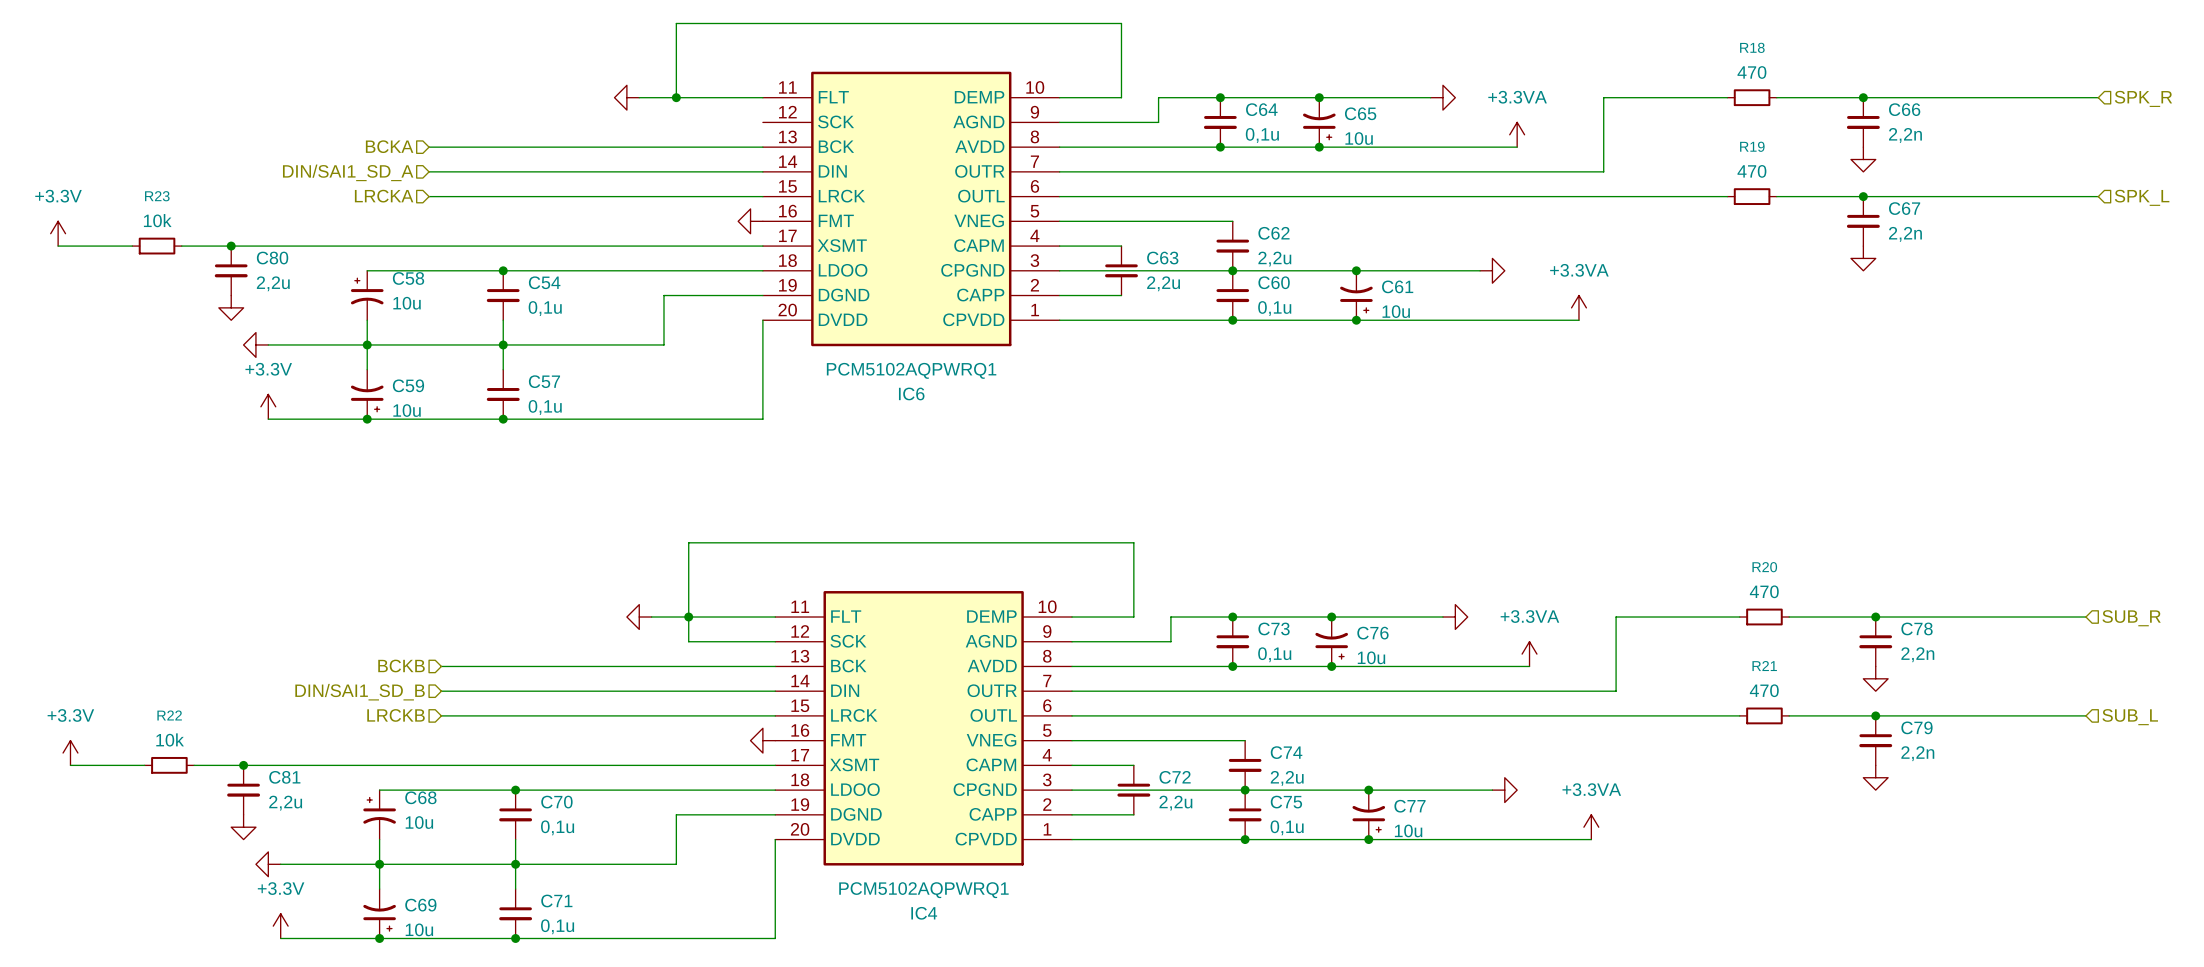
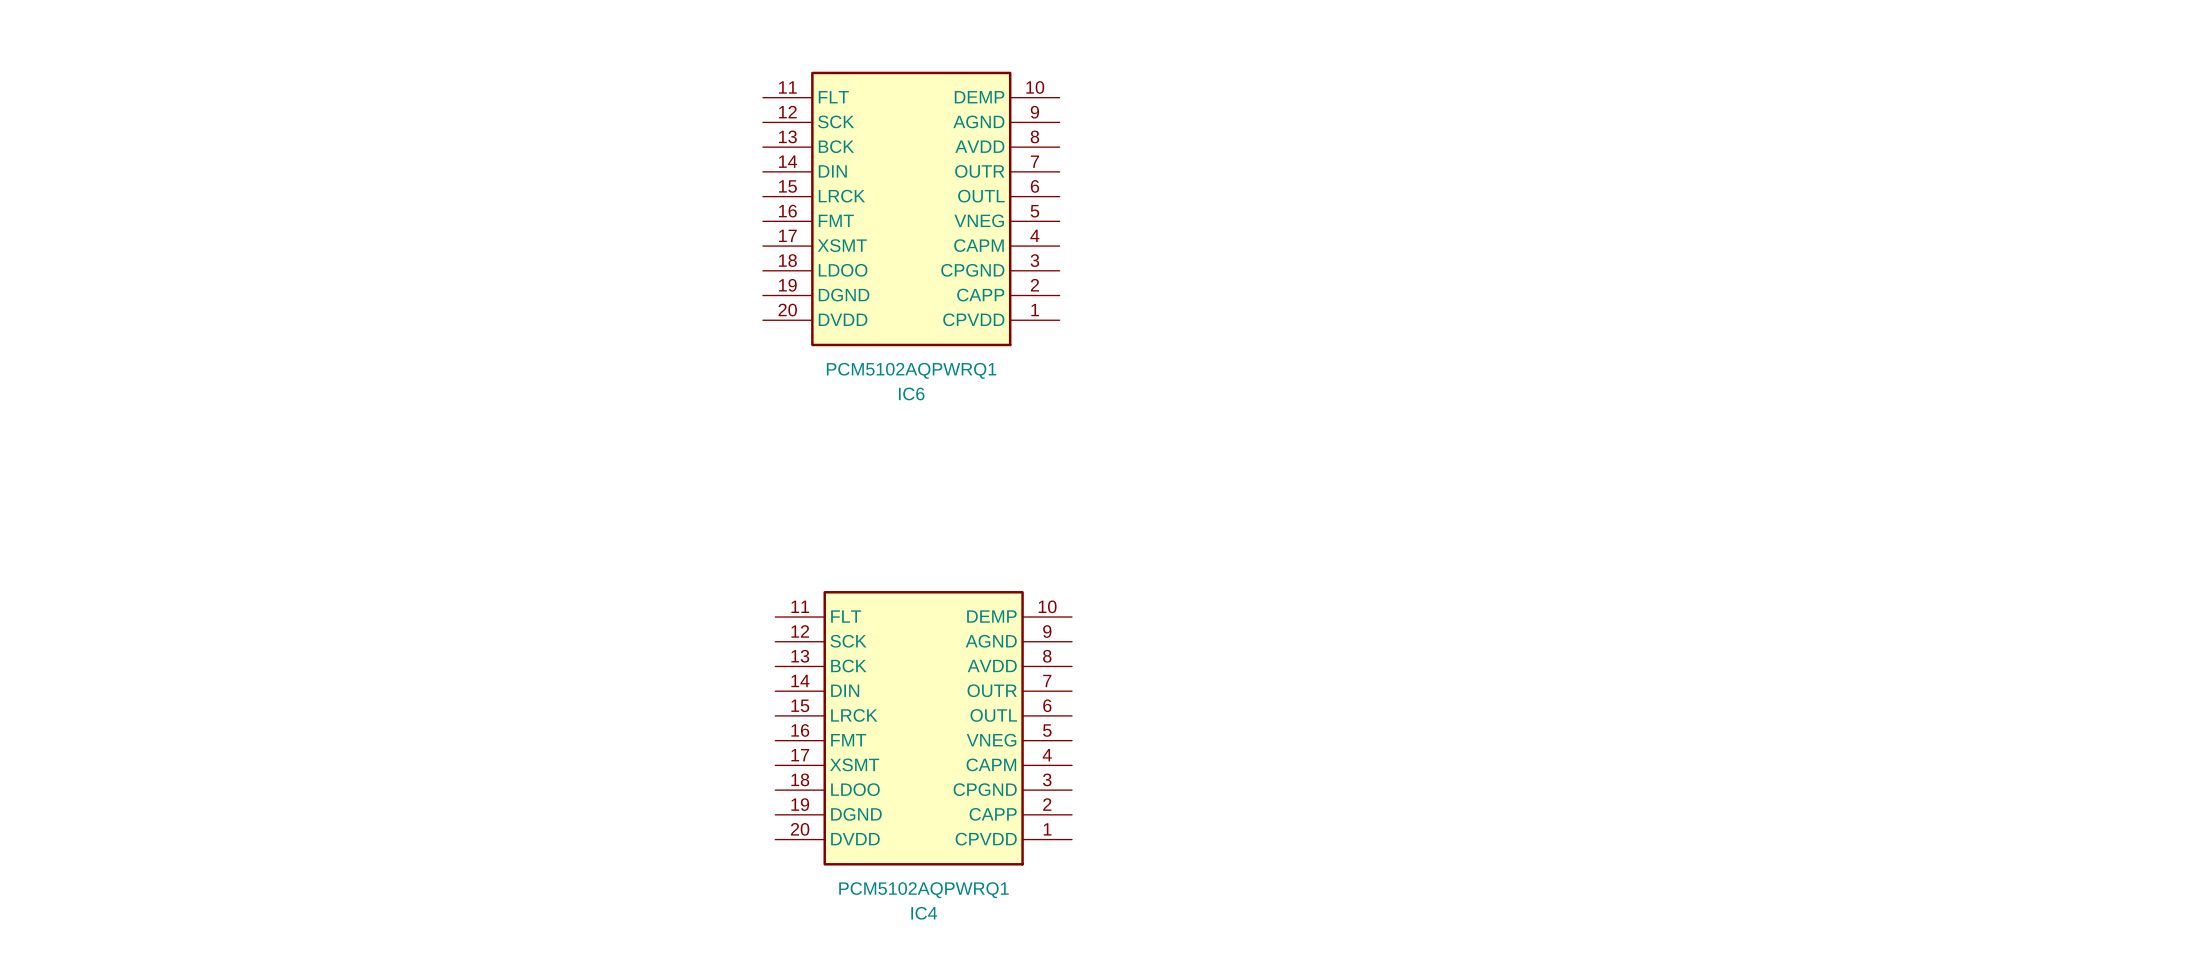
power symbol: (626, 97) -> none
wire: (639, 97) (762, 97) -> none
wire: (676, 97) (676, 23) (1121, 23) (1121, 97) (1059, 97) -> none
junction: (676, 97) -> none
junction: (1220, 97) -> none
junction: (1319, 97) -> none
wire: (1430, 97) (1158, 97) (1158, 122) (1059, 122) -> none
power symbol: (1442, 97) -> none
wire: (1727, 97) (1603, 97) (1603, 171) (1059, 171) -> none
R18: 470 (1752, 97) -> none
wire: (1776, 97) (2098, 97) -> none
junction: (1863, 97) -> none
hierarchical label: SPK_R (2143, 98) -> none
C64: 0,1u (1220, 122) -> none
C65: 10u (1319, 122) -> none
C66: 2,2n (1863, 122) -> none
power symbol: +3.3VA (1517, 134) -> none
hierarchical label: BCKA (389, 146) -> none
wire: (429, 147) (762, 147) -> none
wire: (1059, 147) (1517, 147) -> none
junction: (1220, 147) -> none
junction: (1319, 147) -> none
power symbol: (1863, 159) -> none
wire: (429, 171) (762, 171) -> none
hierarchical label: DIN/SAI1_SD_A (348, 172) -> none
hierarchical label: LRCKA (384, 196) -> none
wire: (429, 196) (762, 196) -> none
wire: (1059, 196) (1727, 196) -> none
R19: 470 (1752, 196) -> none
wire: (1776, 196) (2098, 196) -> none
junction: (1863, 196) -> none
hierarchical label: SPK_L (2142, 197) -> none
power symbol: (750, 221) -> none
wire: (1059, 221) (1232, 221) -> none
C67: 2,2n (1863, 221) -> none
power symbol: +3.3V (58, 233) -> none
wire: (58, 246) (132, 246) -> none
R23: 10k (157, 246) -> none
wire: (181, 246) (762, 246) -> none
junction: (231, 246) -> none
wire: (1059, 246) (1121, 246) -> none
C62: 2,2u (1232, 246) -> none
power symbol: (1863, 258) -> none
C80: 2,2u (231, 270) -> none
wire: (367, 270) (762, 270) -> none
junction: (503, 270) -> none
wire: (1059, 270) (1480, 270) -> none
C63: 2,2u (1121, 270) -> none
junction: (1232, 270) -> none
junction: (1356, 270) -> none
power symbol: (1492, 270) -> none
C58: 10u (367, 295) -> none
C54: 0,1u (503, 295) -> none
wire: (762, 295) (663, 295) (663, 344) (268, 344) -> none
wire: (1059, 295) (1121, 295) -> none
C60: 0,1u (1232, 295) -> none
C61: 10u (1356, 295) -> none
power symbol: (231, 307) -> none
power symbol: +3.3VA (1578, 307) -> none
wire: (367, 320) (367, 369) -> none
wire: (503, 320) (503, 369) -> none
wire: (762, 320) (762, 419) (268, 419) -> none
wire: (1059, 320) (1578, 320) -> none
junction: (1232, 320) -> none
junction: (1356, 320) -> none
power symbol: (255, 344) -> none
junction: (367, 344) -> none
junction: (503, 344) -> none
C59: 10u (367, 394) -> none
C57: 0,1u (503, 394) -> none
power symbol: +3.3V (268, 406) -> none
junction: (367, 419) -> none
junction: (503, 419) -> none
power symbol: (639, 617) -> none
wire: (651, 617) (775, 617) -> none
junction: (688, 617) -> none
wire: (1072, 617) (1133, 617) (1133, 542) (688, 542) (688, 641) (775, 641) -> none
junction: (1232, 617) -> none
junction: (1331, 617) -> none
wire: (1442, 617) (1170, 617) (1170, 641) (1072, 641) -> none
power symbol: (1455, 617) -> none
wire: (1739, 617) (1616, 617) (1616, 691) (1072, 691) -> none
R20: 470 (1764, 617) -> none
wire: (1789, 617) (2085, 617) -> none
junction: (1875, 617) -> none
hierarchical label: SUB_R (2131, 618) -> none
C73: 0,1u (1232, 641) -> none
C76: 10u (1331, 641) -> none
C78: 2,2n (1875, 641) -> none
power symbol: +3.3VA (1529, 654) -> none
hierarchical label: BCKB (401, 665) -> none
wire: (441, 666) (775, 666) -> none
wire: (1072, 666) (1529, 666) -> none
junction: (1232, 666) -> none
junction: (1331, 666) -> none
power symbol: (1875, 678) -> none
wire: (441, 691) (775, 691) -> none
hierarchical label: DIN/SAI1_SD_B (360, 692) -> none
hierarchical label: LRCKB (396, 715) -> none
wire: (441, 715) (775, 715) -> none
wire: (1072, 715) (1739, 715) -> none
R21: 470 (1764, 715) -> none
wire: (1789, 715) (2085, 715) -> none
junction: (1875, 715) -> none
hierarchical label: SUB_L (2130, 717) -> none
power symbol: (762, 740) -> none
wire: (1072, 740) (1245, 740) -> none
C79: 2,2n (1875, 740) -> none
power symbol: +3.3V (70, 753) -> none
wire: (70, 765) (144, 765) -> none
R22: 10k (169, 765) -> none
wire: (194, 765) (775, 765) -> none
junction: (243, 765) -> none
wire: (1072, 765) (1133, 765) -> none
C74: 2,2u (1245, 765) -> none
power symbol: (1875, 777) -> none
C81: 2,2u (243, 790) -> none
wire: (379, 790) (775, 790) -> none
junction: (515, 790) -> none
wire: (1072, 790) (1492, 790) -> none
C72: 2,2u (1133, 790) -> none
junction: (1245, 790) -> none
junction: (1368, 790) -> none
power symbol: (1504, 790) -> none
C68: 10u (379, 814) -> none
C70: 0,1u (515, 814) -> none
wire: (775, 814) (676, 814) (676, 864) (280, 864) -> none
wire: (1072, 814) (1133, 814) -> none
C75: 0,1u (1245, 814) -> none
C77: 10u (1368, 814) -> none
power symbol: (243, 827) -> none
power symbol: +3.3VA (1591, 827) -> none
wire: (379, 839) (379, 889) -> none
wire: (515, 839) (515, 889) -> none
wire: (775, 839) (775, 938) (280, 938) -> none
wire: (1072, 839) (1591, 839) -> none
junction: (1245, 839) -> none
junction: (1368, 839) -> none
power symbol: (268, 864) -> none
junction: (379, 864) -> none
junction: (515, 864) -> none
C69: 10u (379, 913) -> none
C71: 0,1u (515, 913) -> none
power symbol: +3.3V (280, 926) -> none
junction: (379, 938) -> none
junction: (515, 938) -> none

